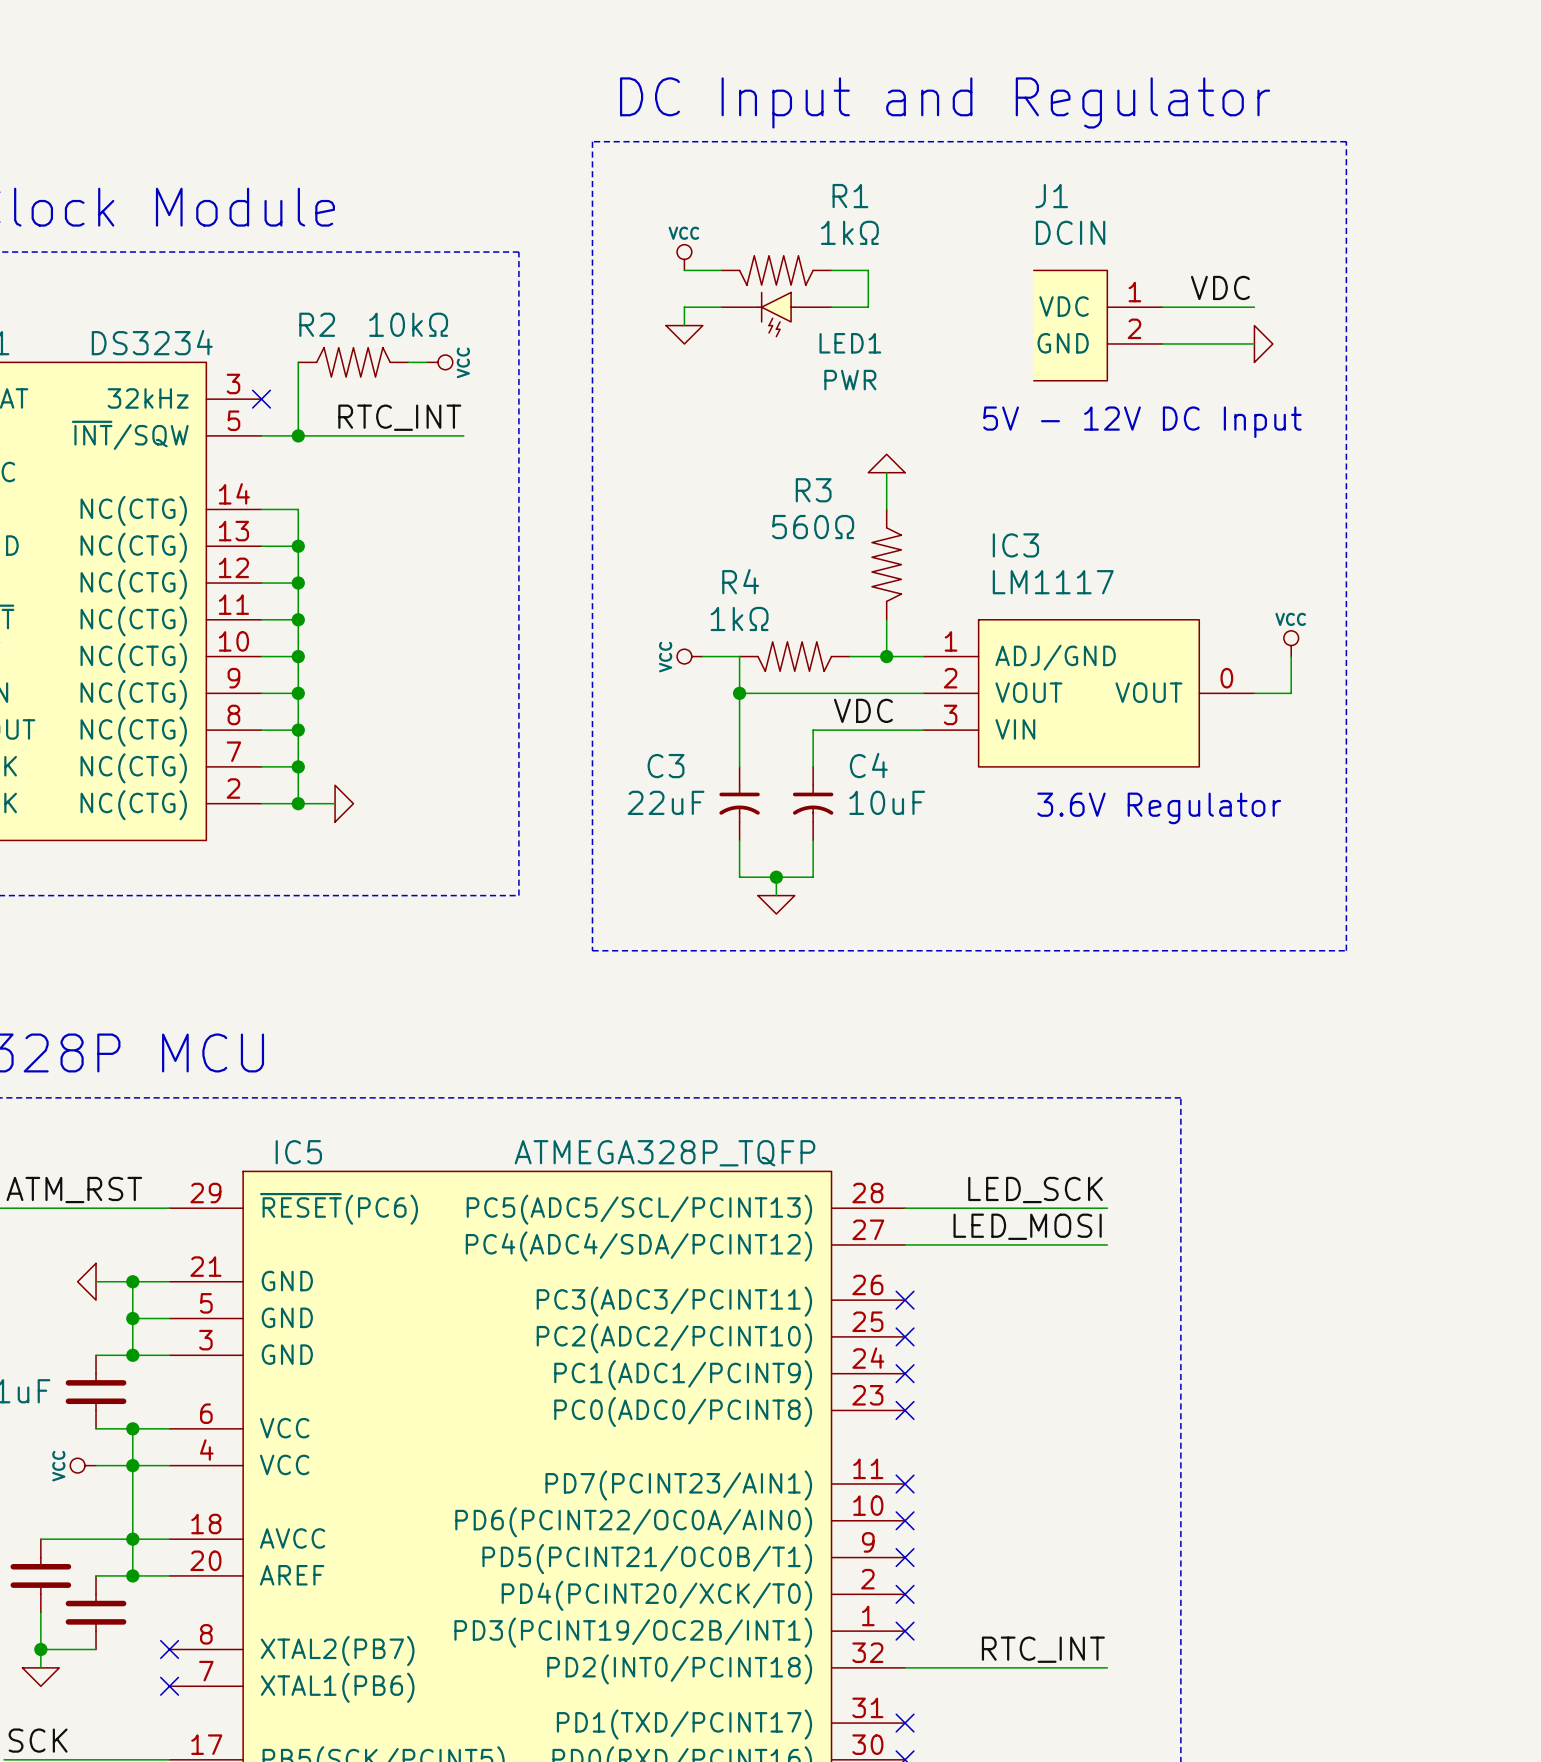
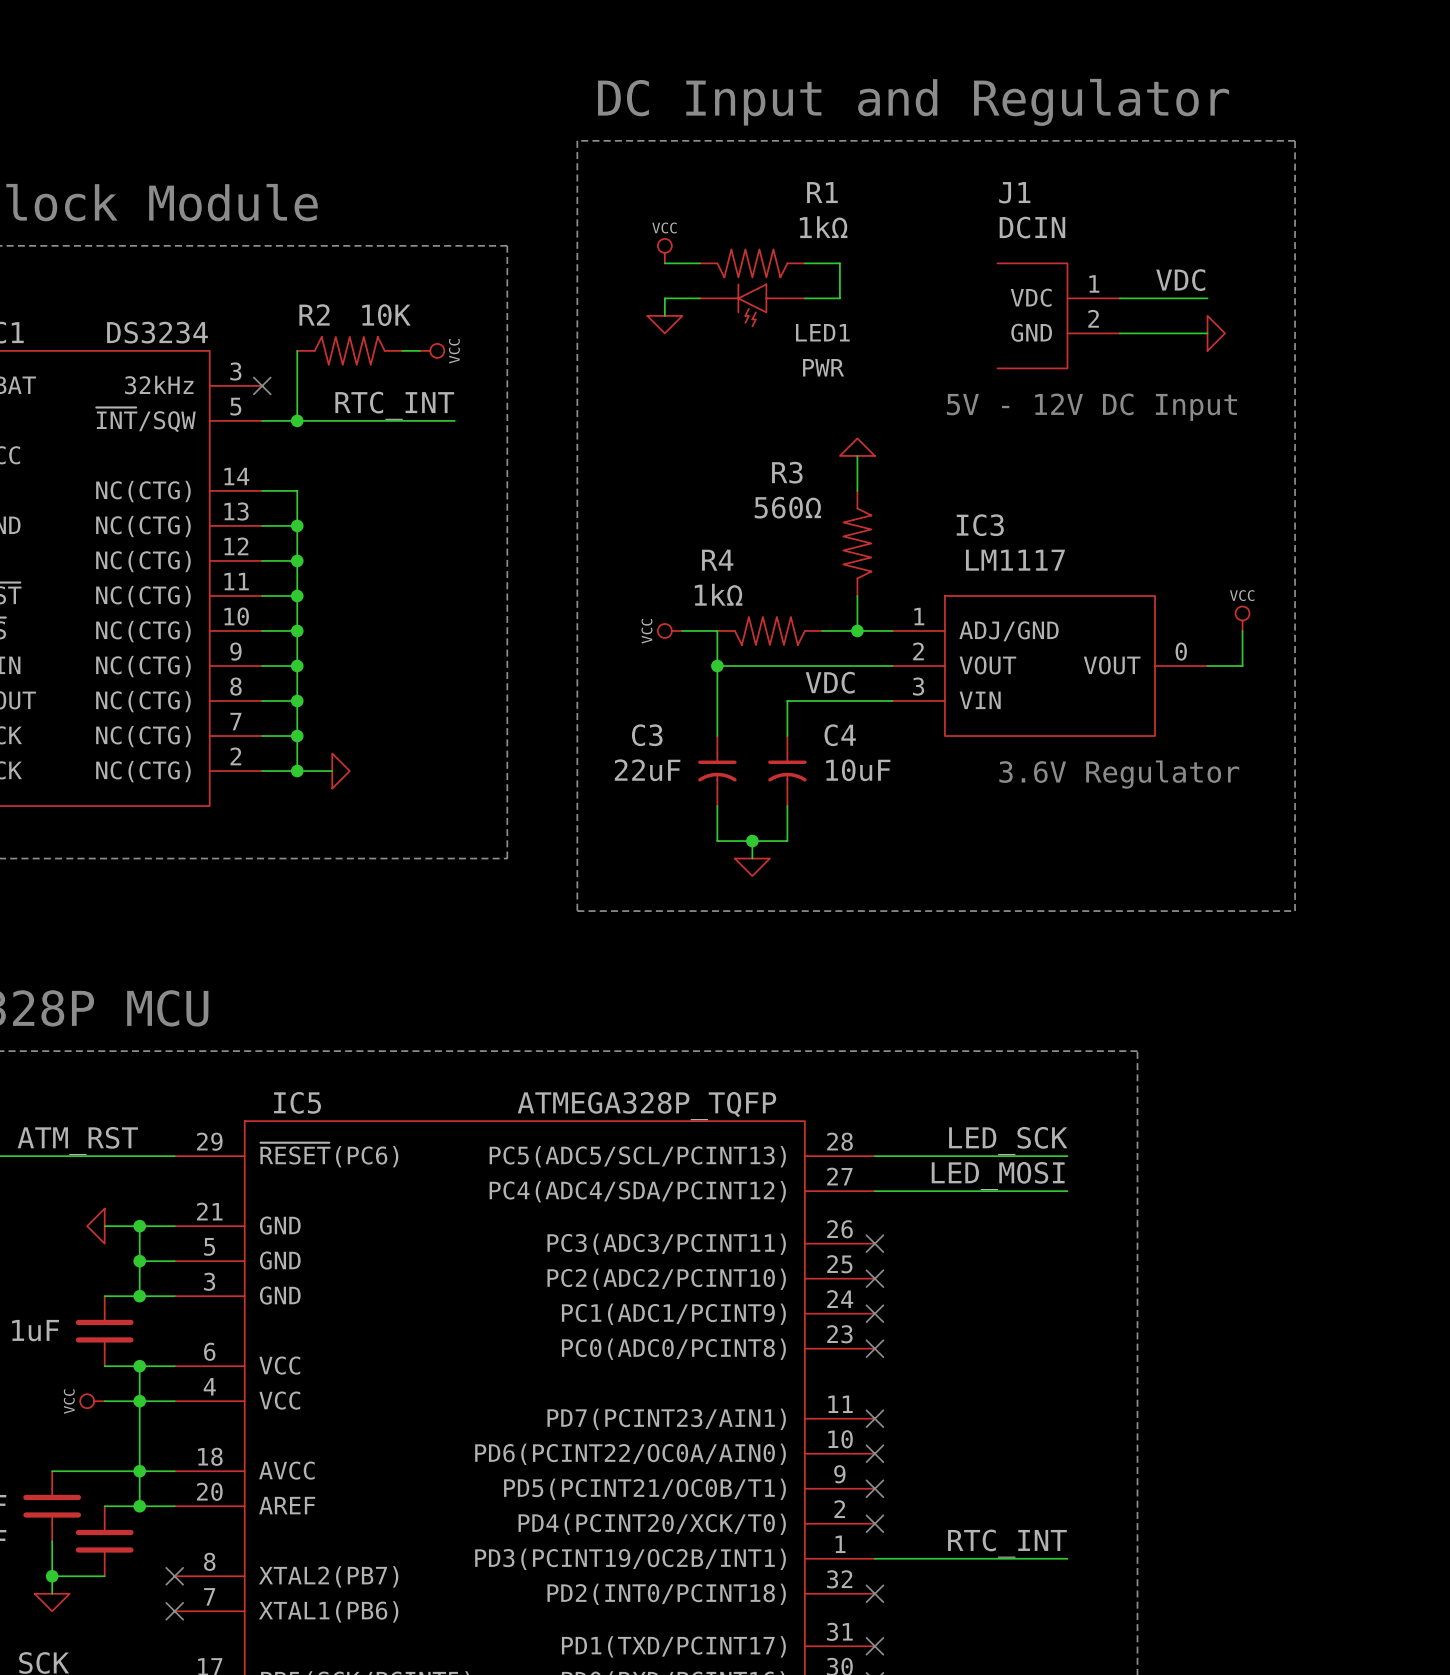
R2 value: 10kΩ (408, 324) -> 10K (386, 315)
no-connect mark position: (905, 1631) -> (874, 1593)
label position: RTC_INT (1043, 1649) -> RTC_INT (1007, 1543)
wire: (905, 1667) (1107, 1667) -> (874, 1558) (1067, 1558)

